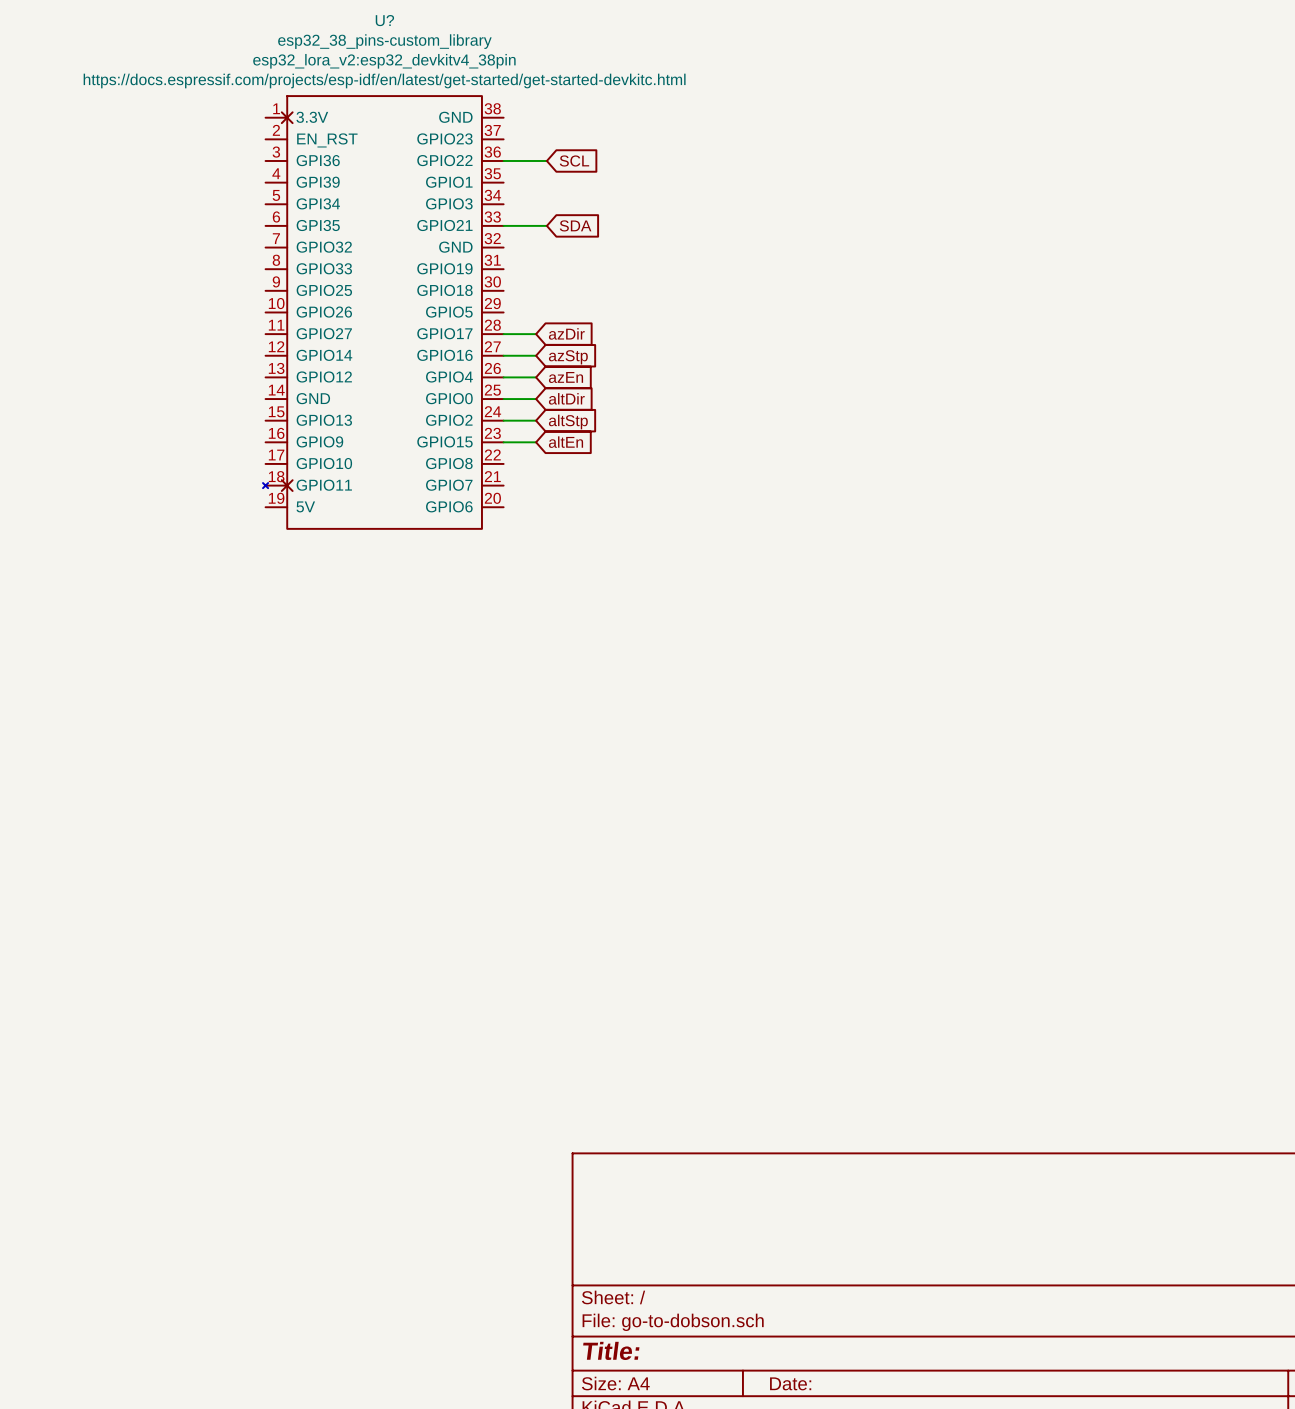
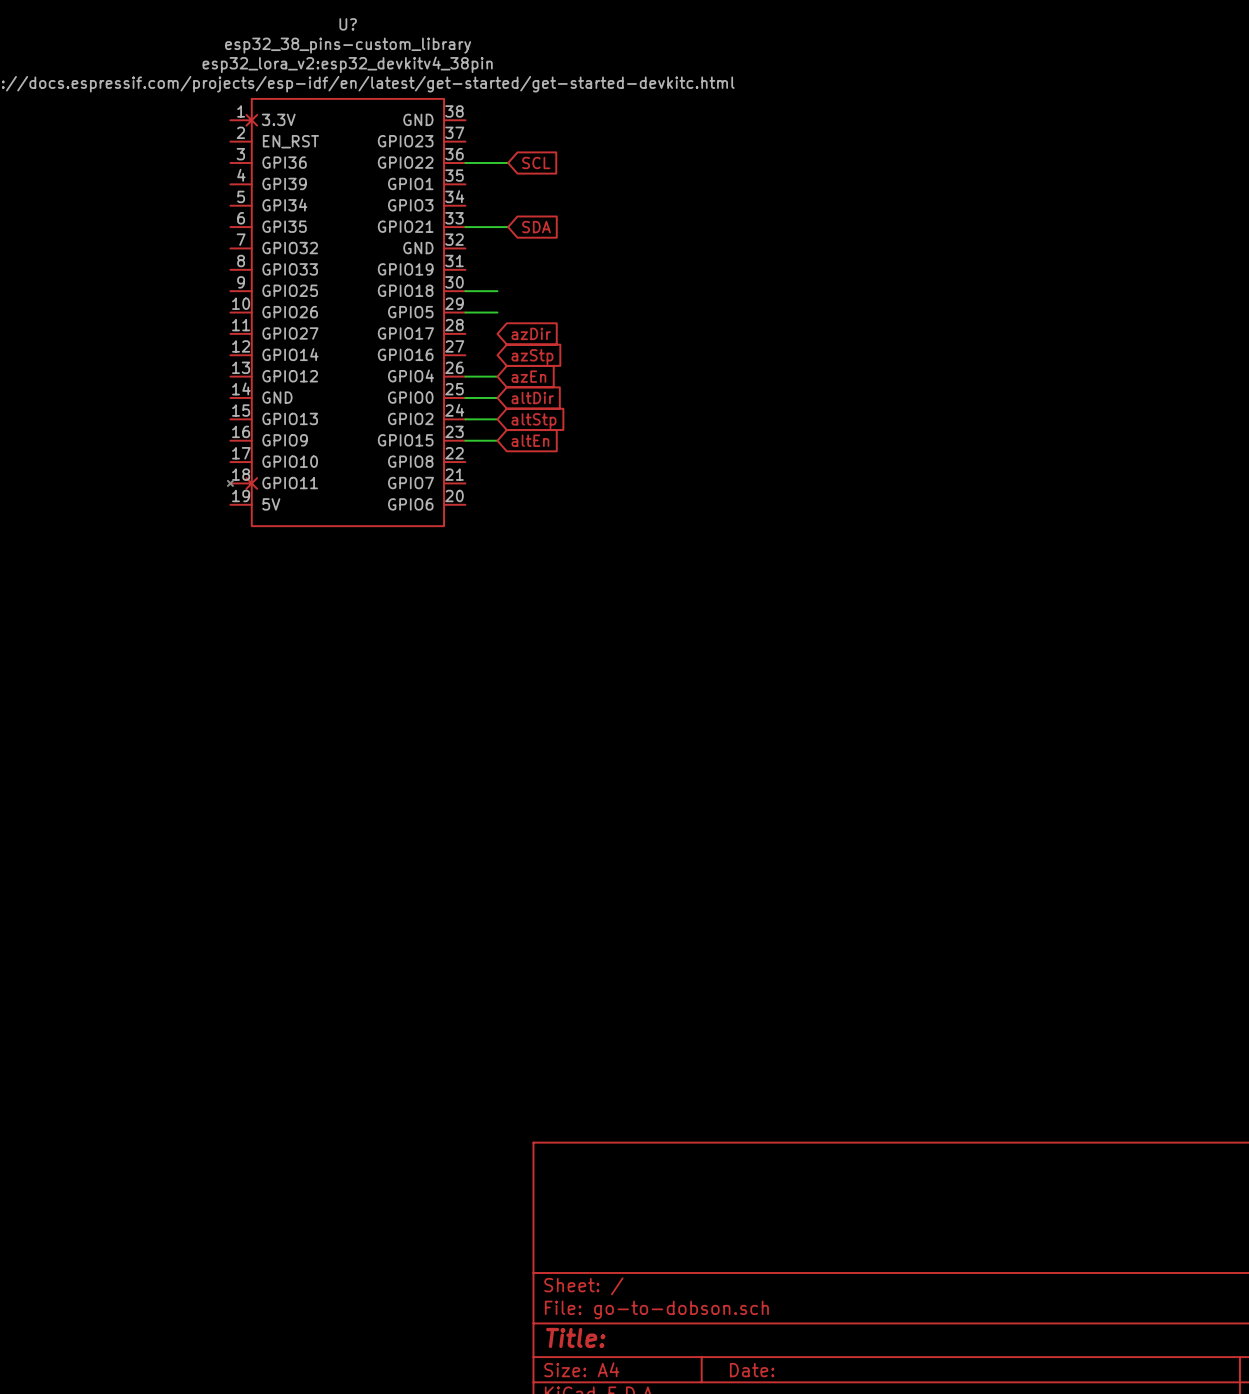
wire: (503, 334) (536, 334) -> (465, 291) (497, 291)
wire: (503, 355) (536, 355) -> (465, 312) (497, 312)

